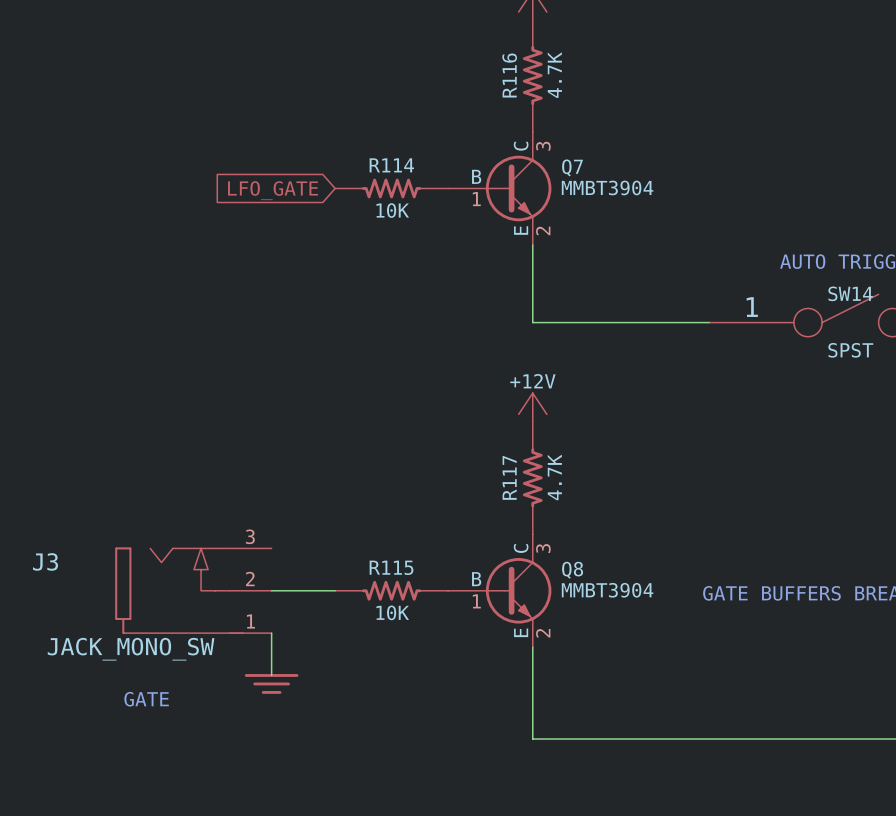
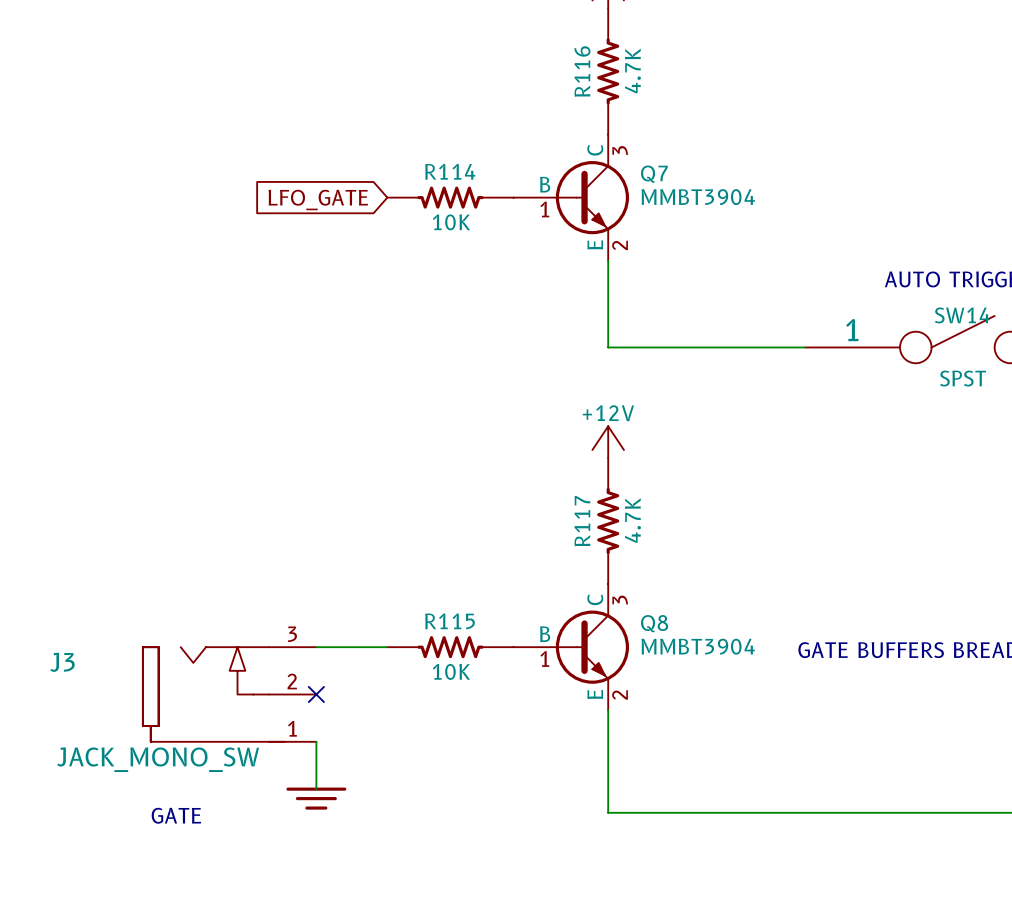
J3 position: (193, 590) -> (229, 694)
wire: (271, 633) (271, 675) -> (316, 789) (316, 741)
no-connect mark: none -> (316, 694)
power symbol position: (271, 683) -> (316, 798)
text position: GATE (146, 699) -> GATE (176, 815)

